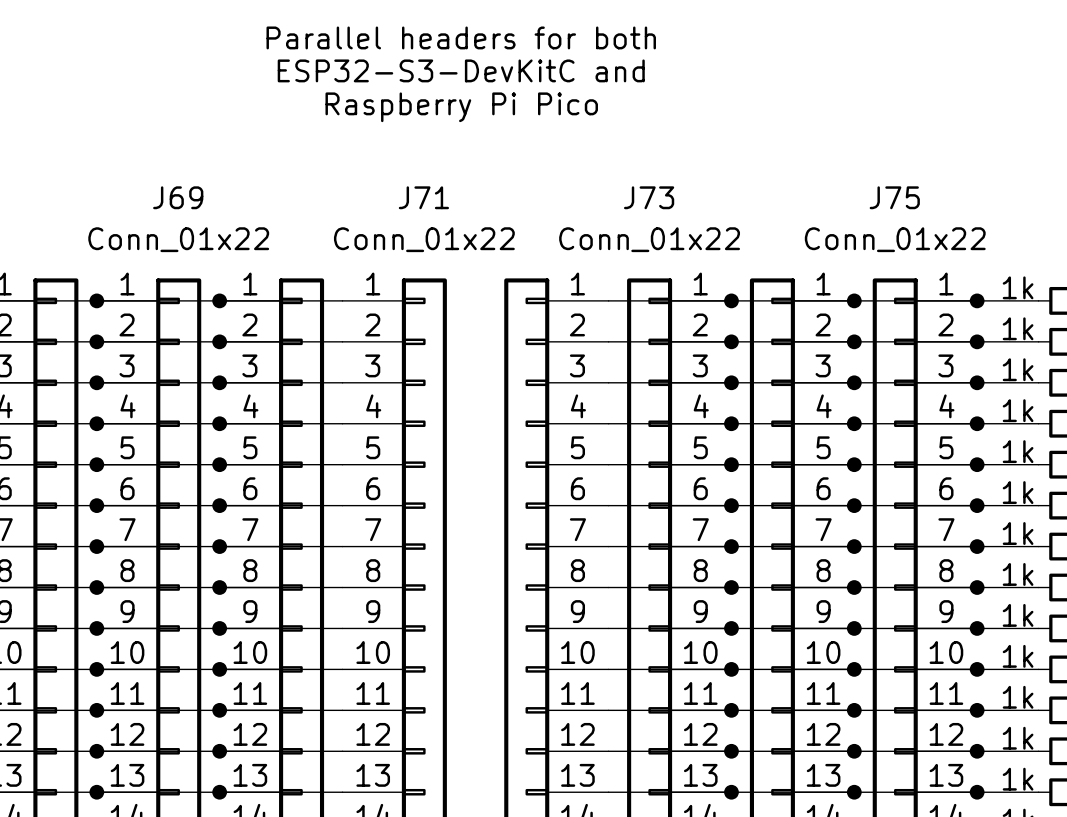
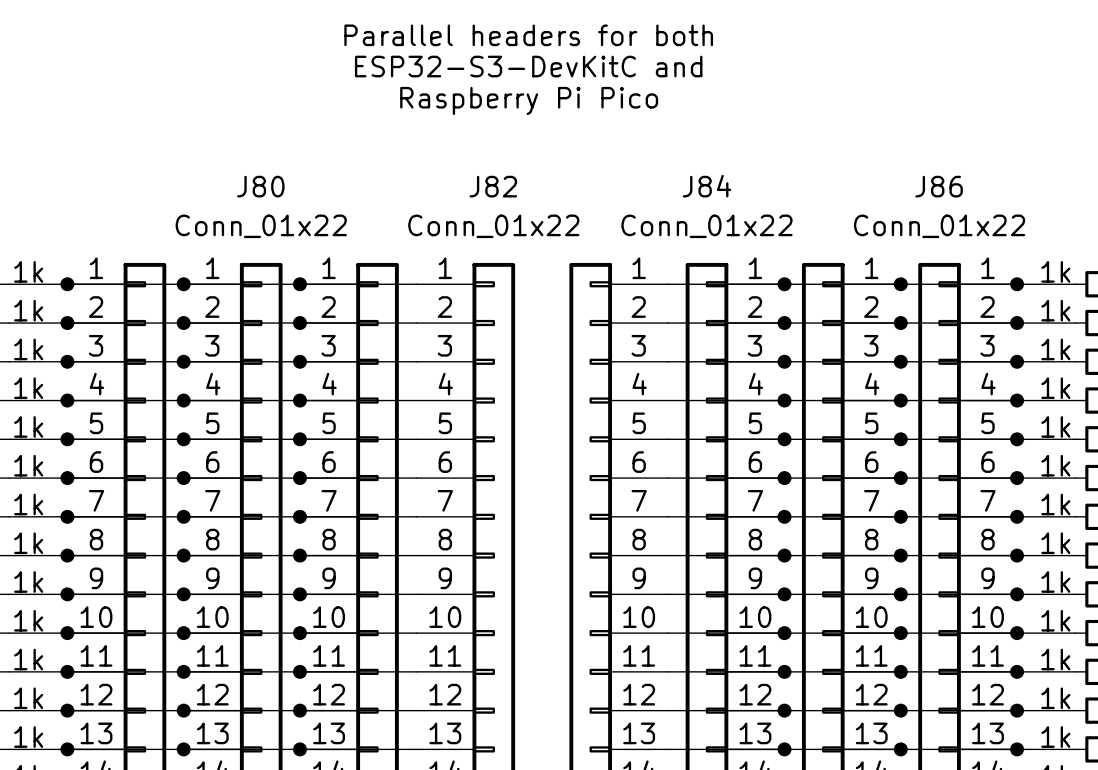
J69 name: J69 (178, 197) -> J80 (260, 186)
J71 name: J71 (423, 197) -> J82 (493, 186)
J73 name: J73 (649, 197) -> J84 (706, 186)
J75 name: J75 (894, 197) -> J86 (939, 186)

